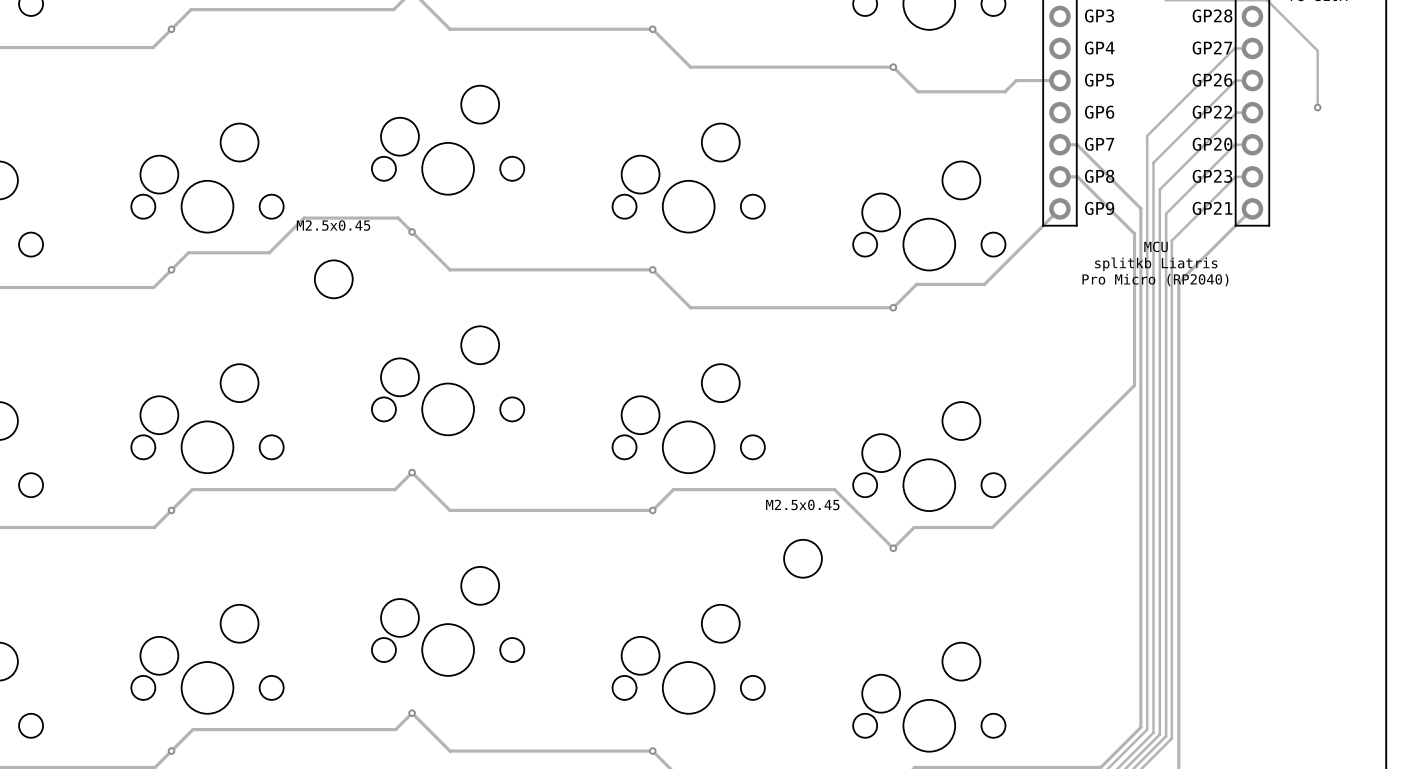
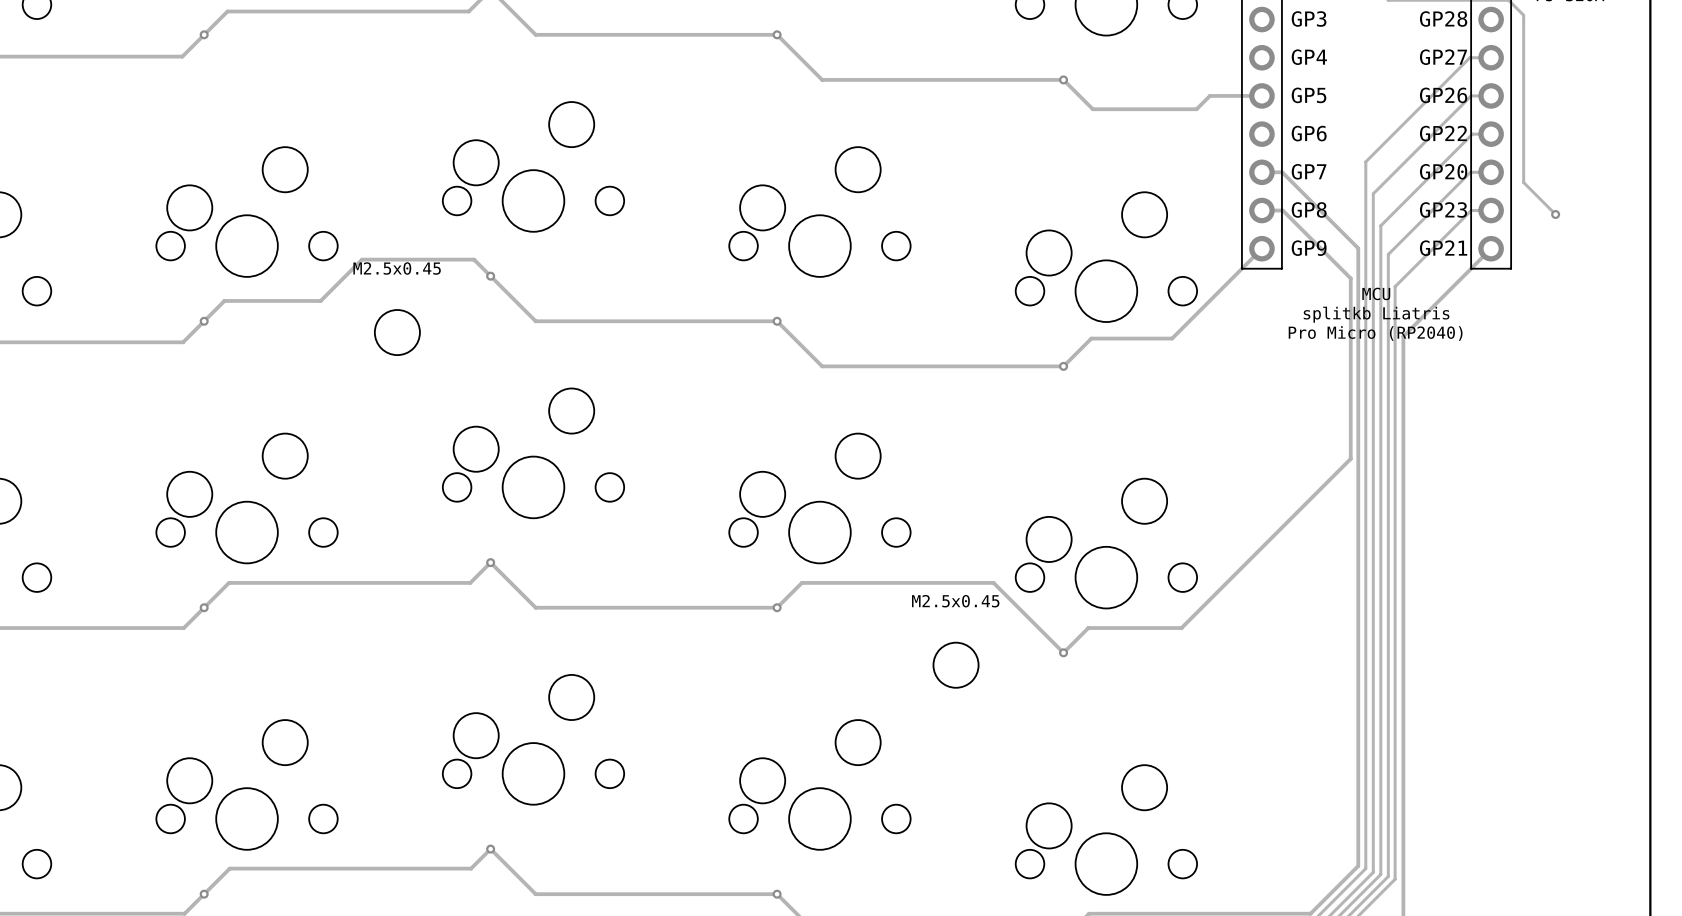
track: (1279, 12) (1317, 50) (1317, 107) -> (1523, 15) (1523, 182) (1555, 214)
via position: (1317, 107) -> (1555, 214)

